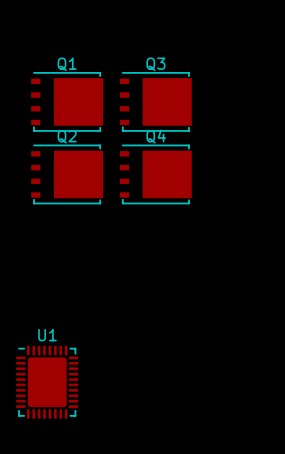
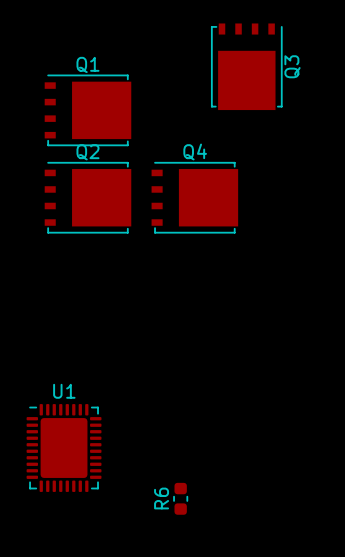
Q3 rotation: 0° (155, 101) -> 90° clockwise (246, 66)
Q3 position: (155, 101) -> (246, 66)
R6: none -> (180, 498)

